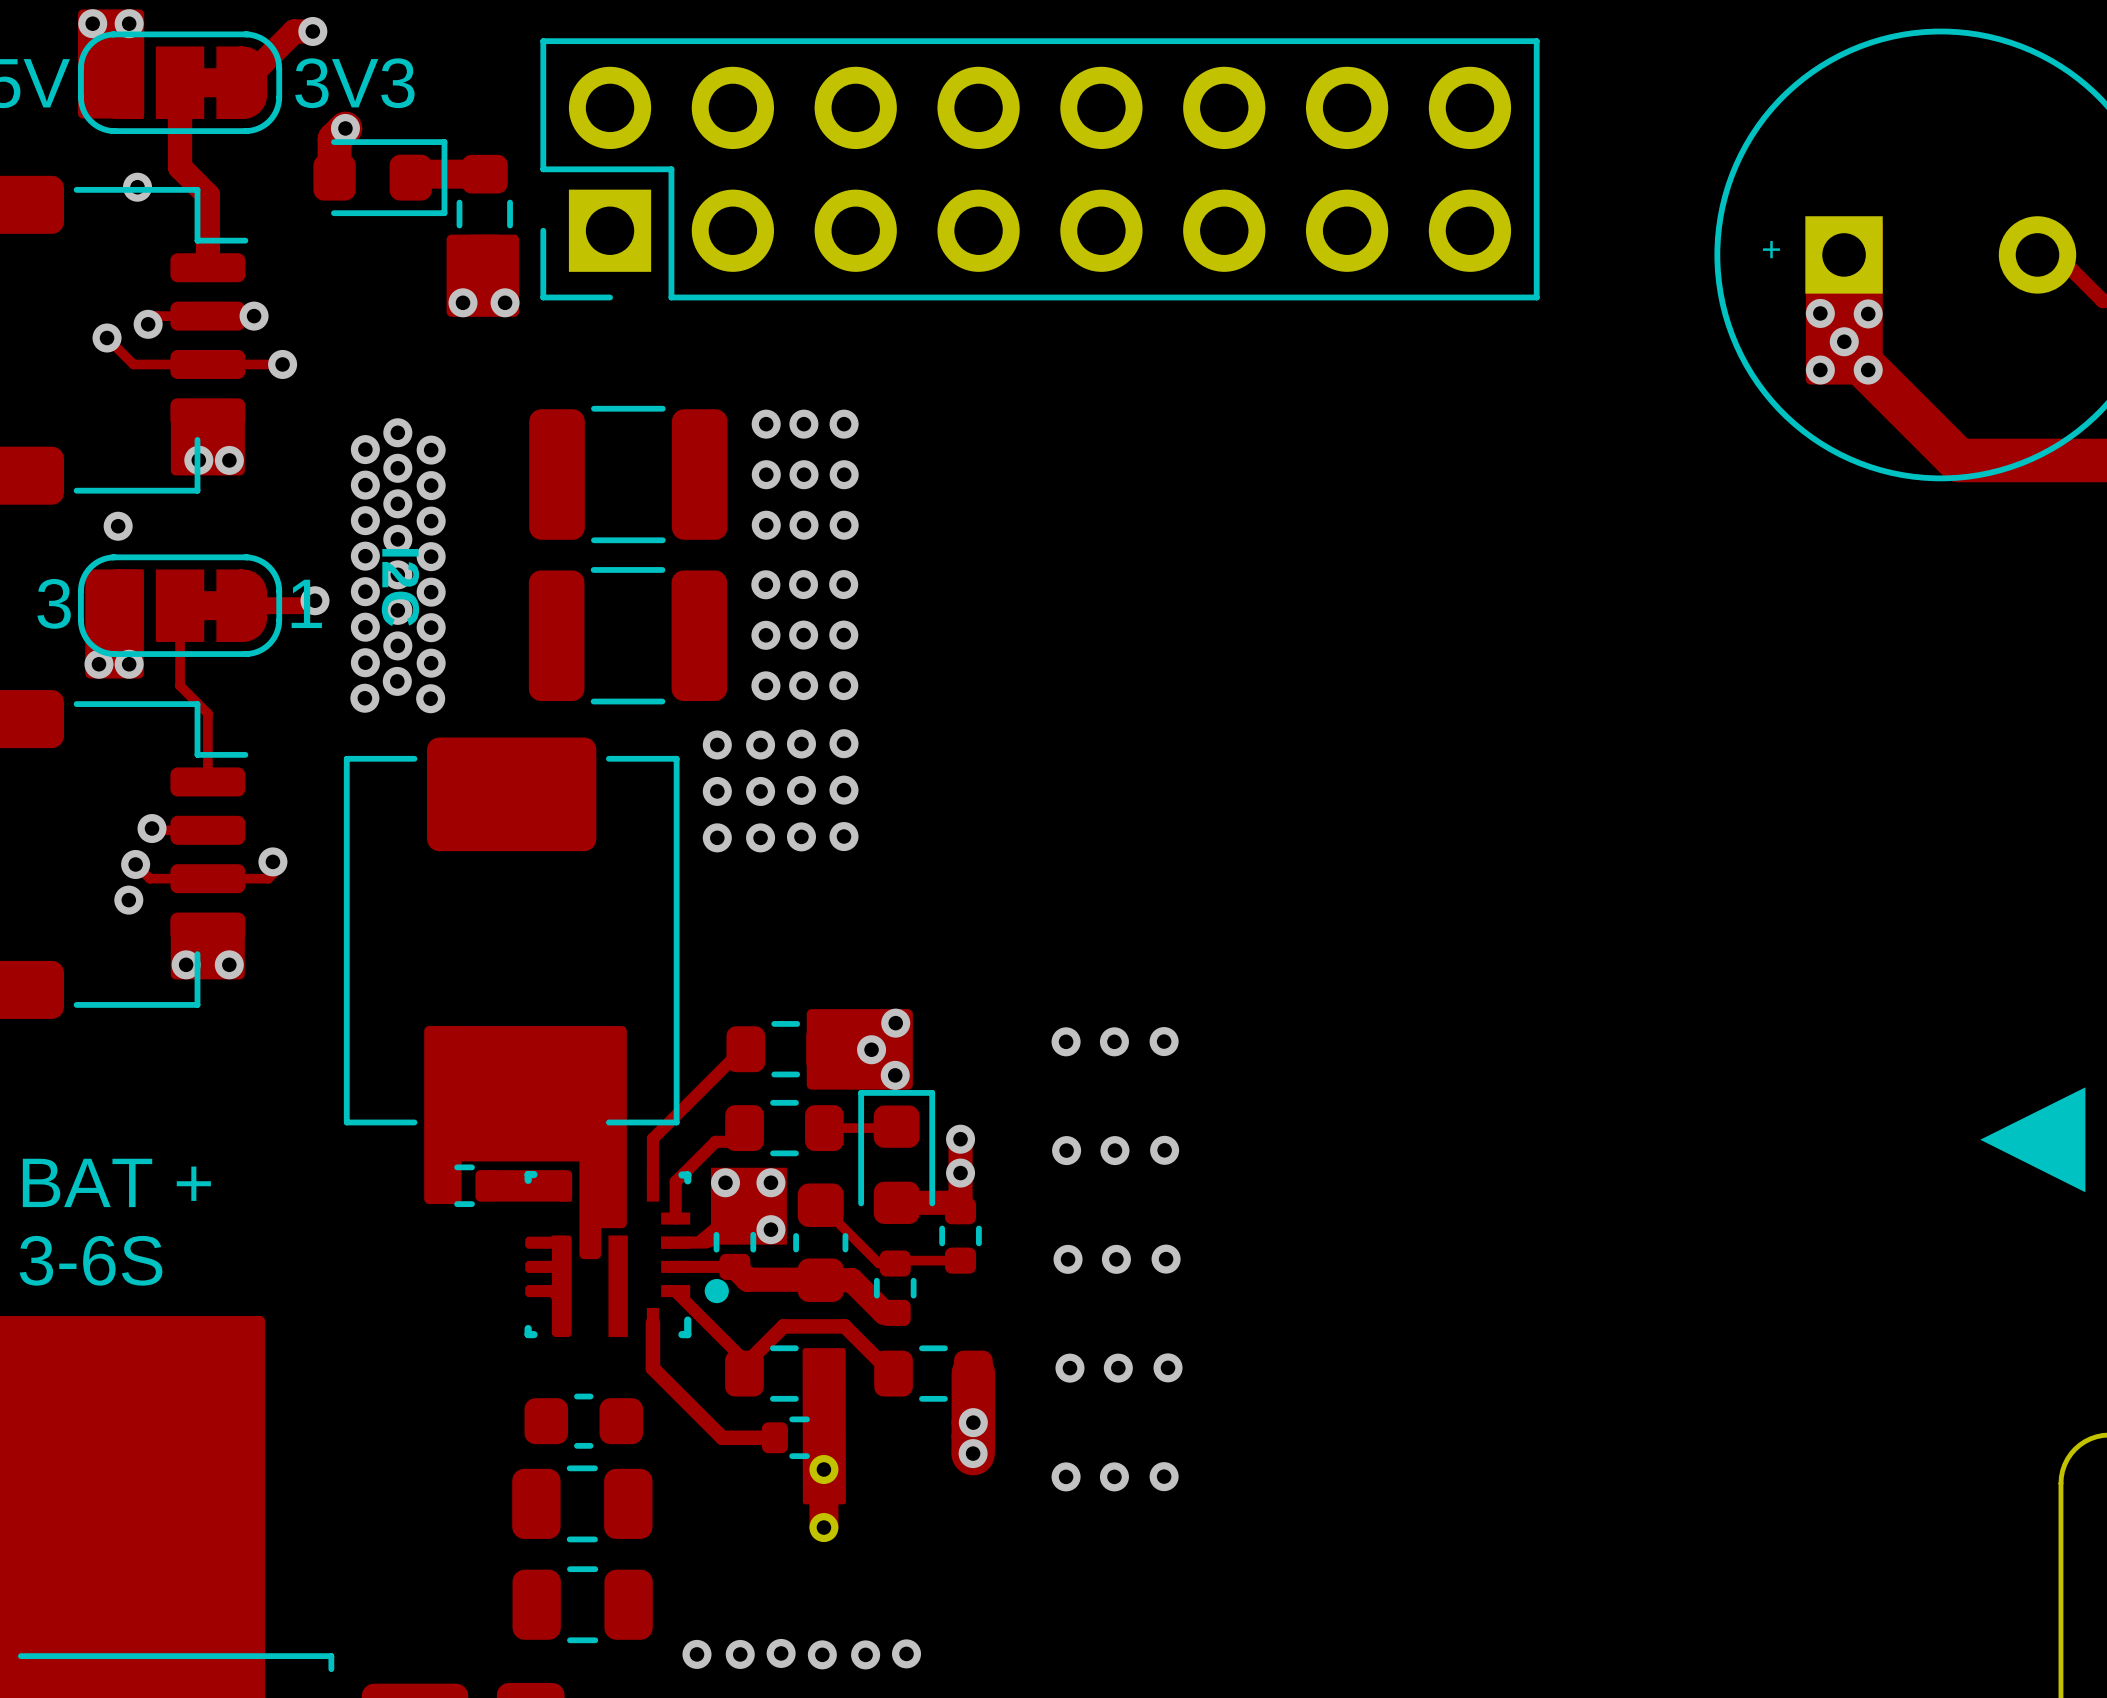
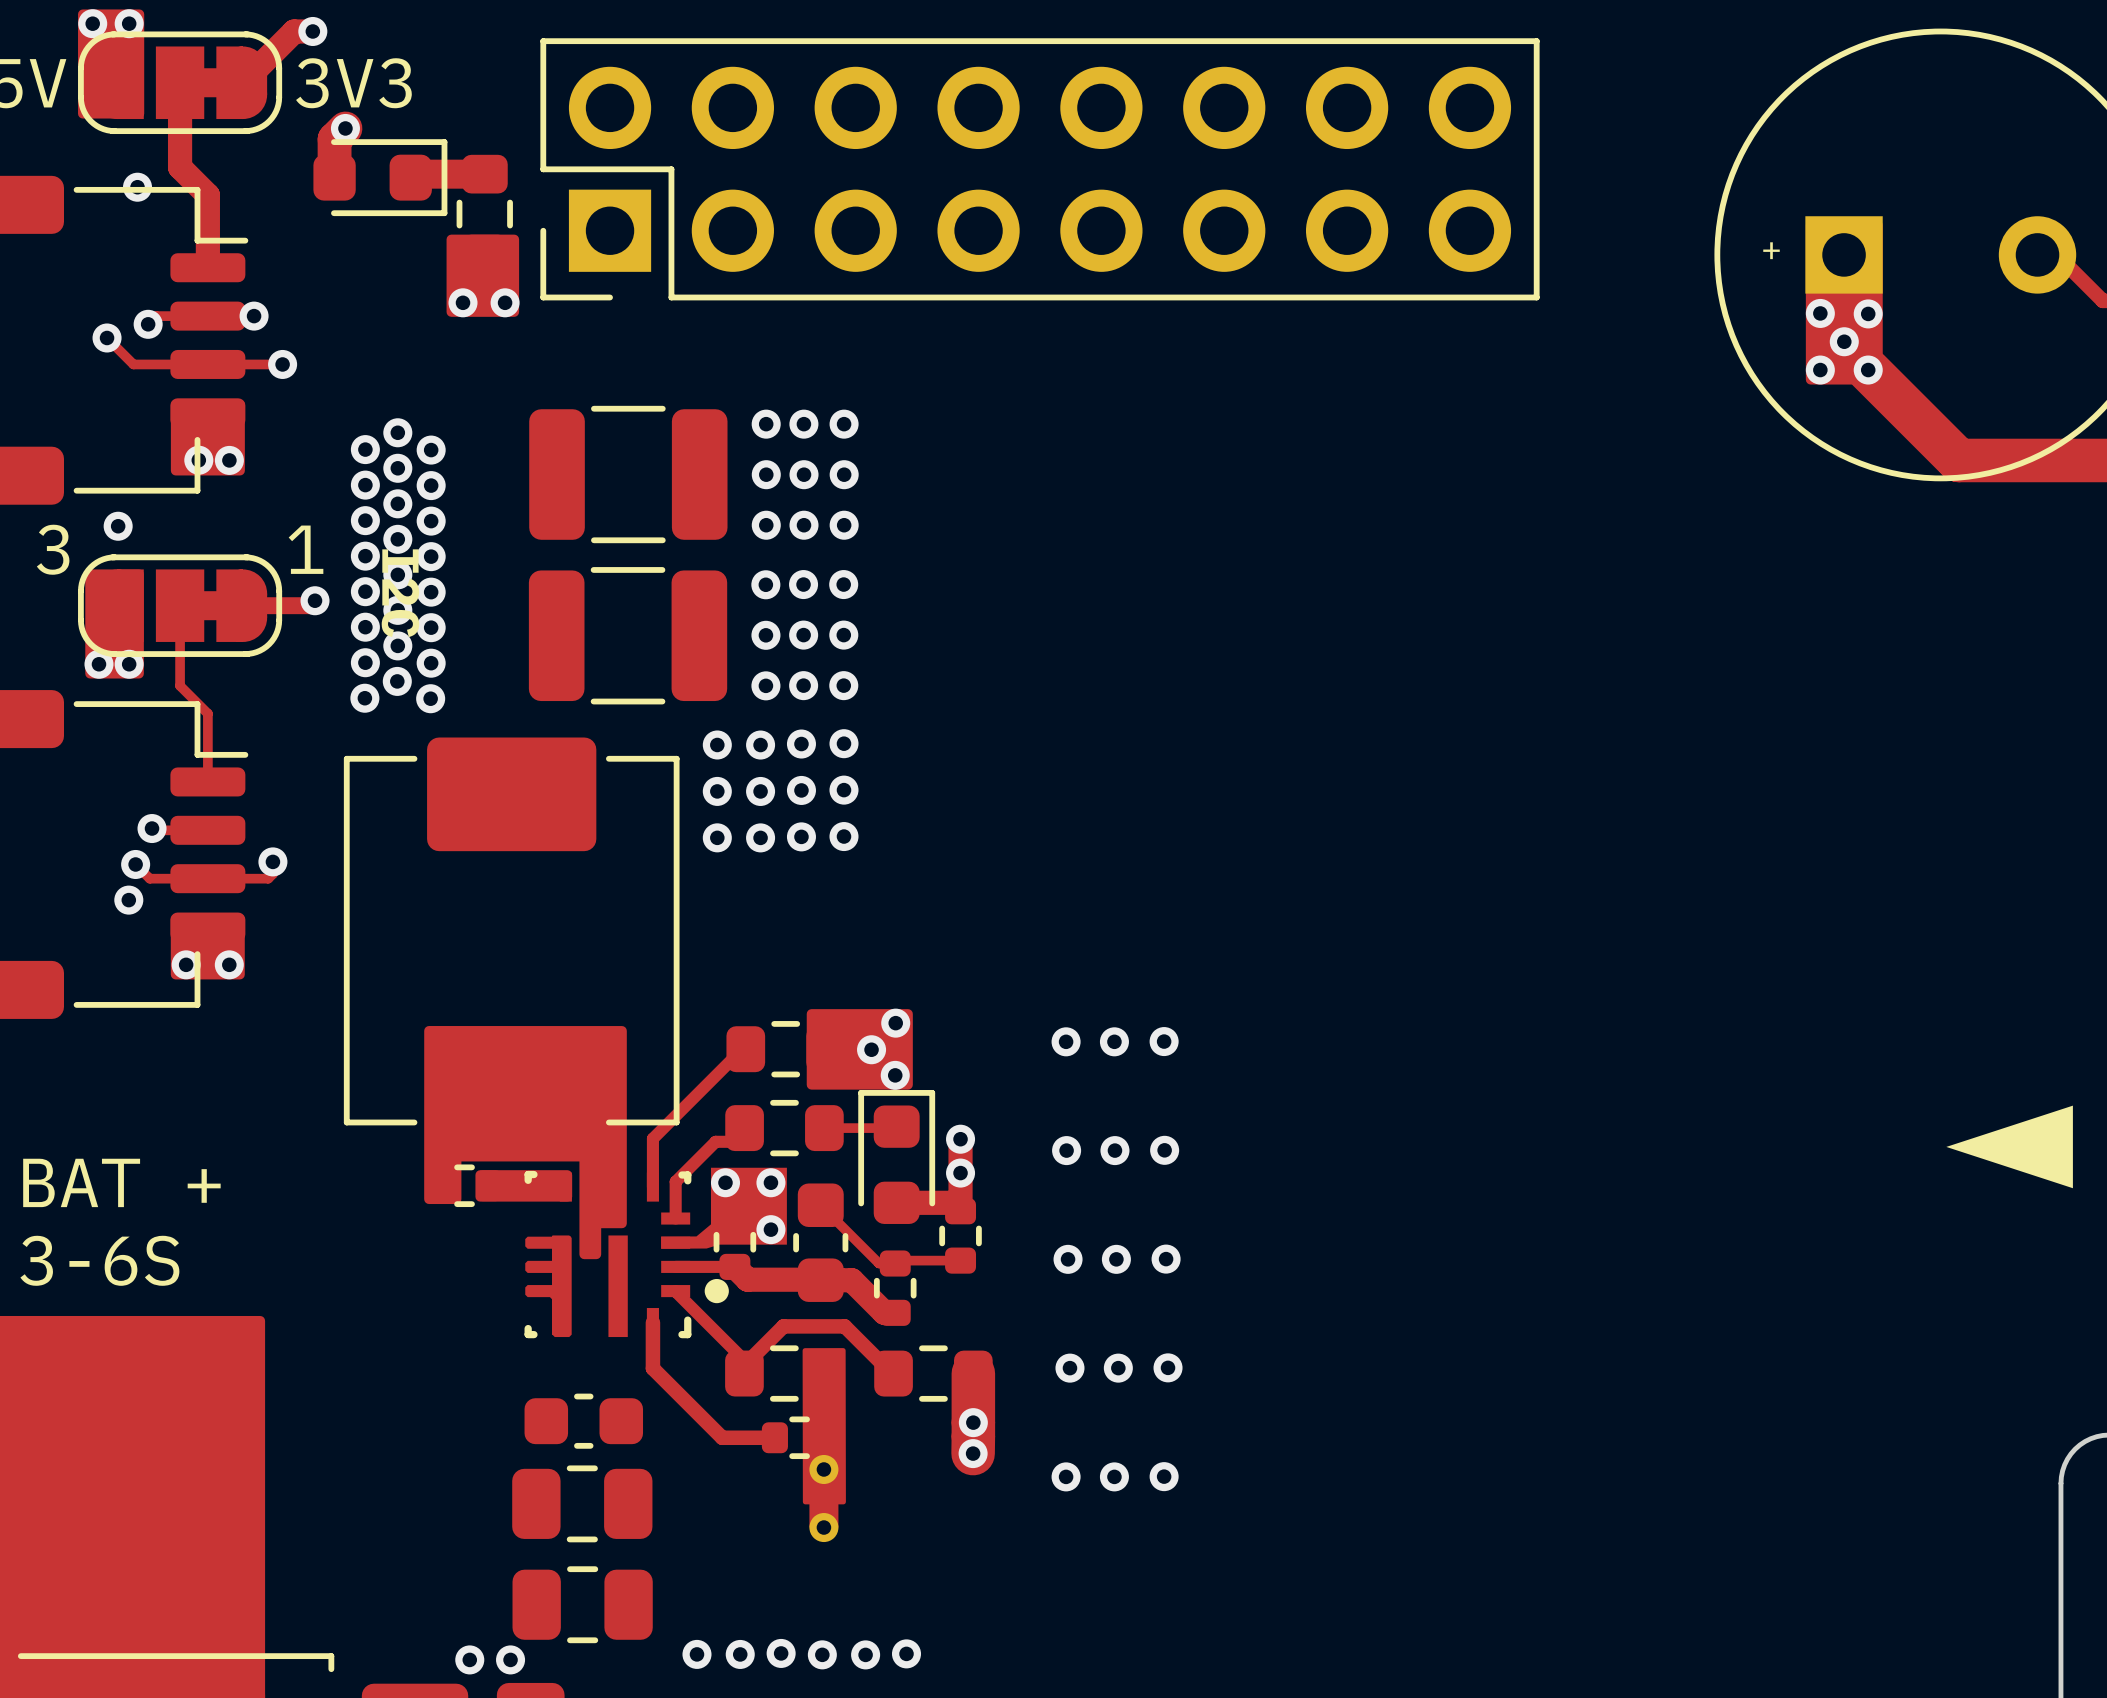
part text position: 3 (54, 603) -> 3 (53, 549)
part text position: 1 (306, 603) -> 1 (306, 549)
via: none -> (469, 1659)
via: none -> (510, 1659)

